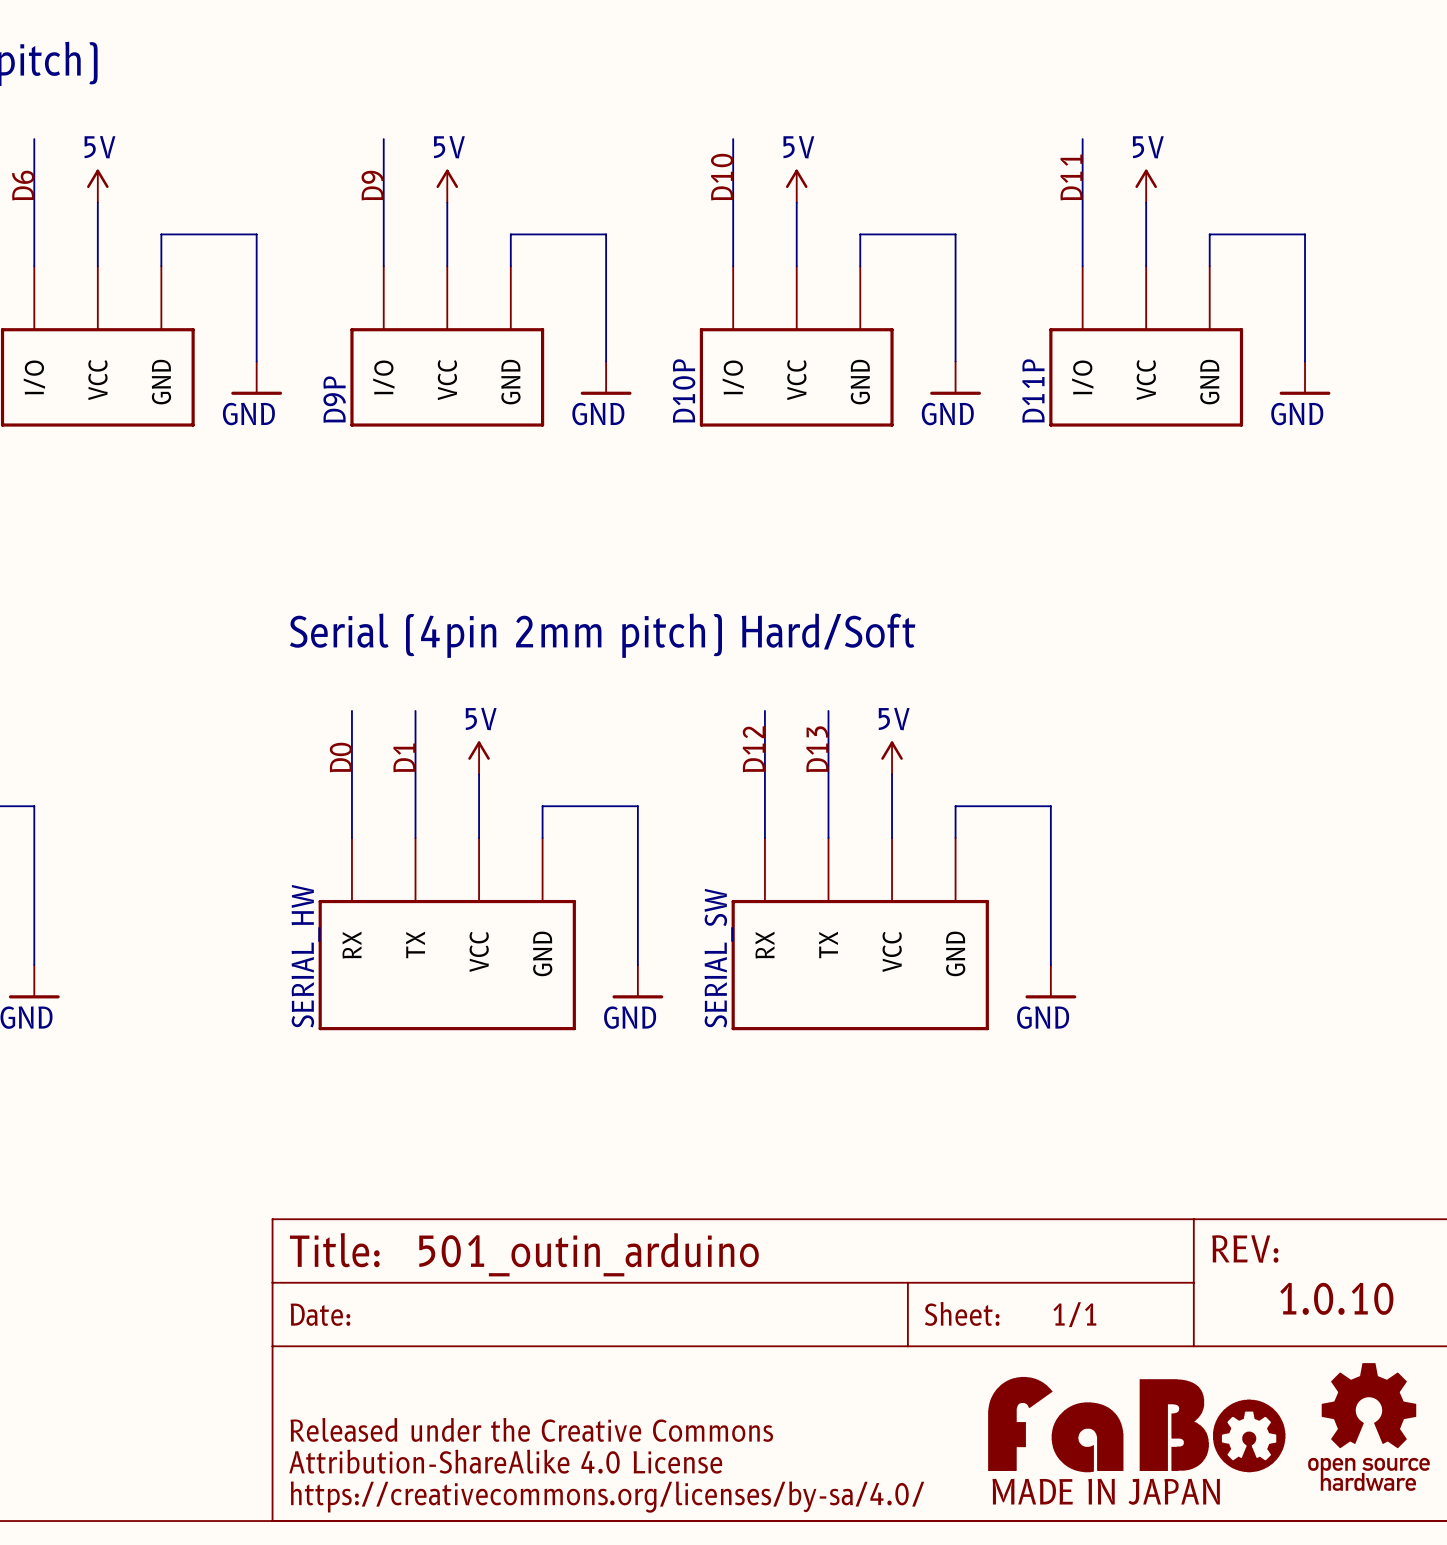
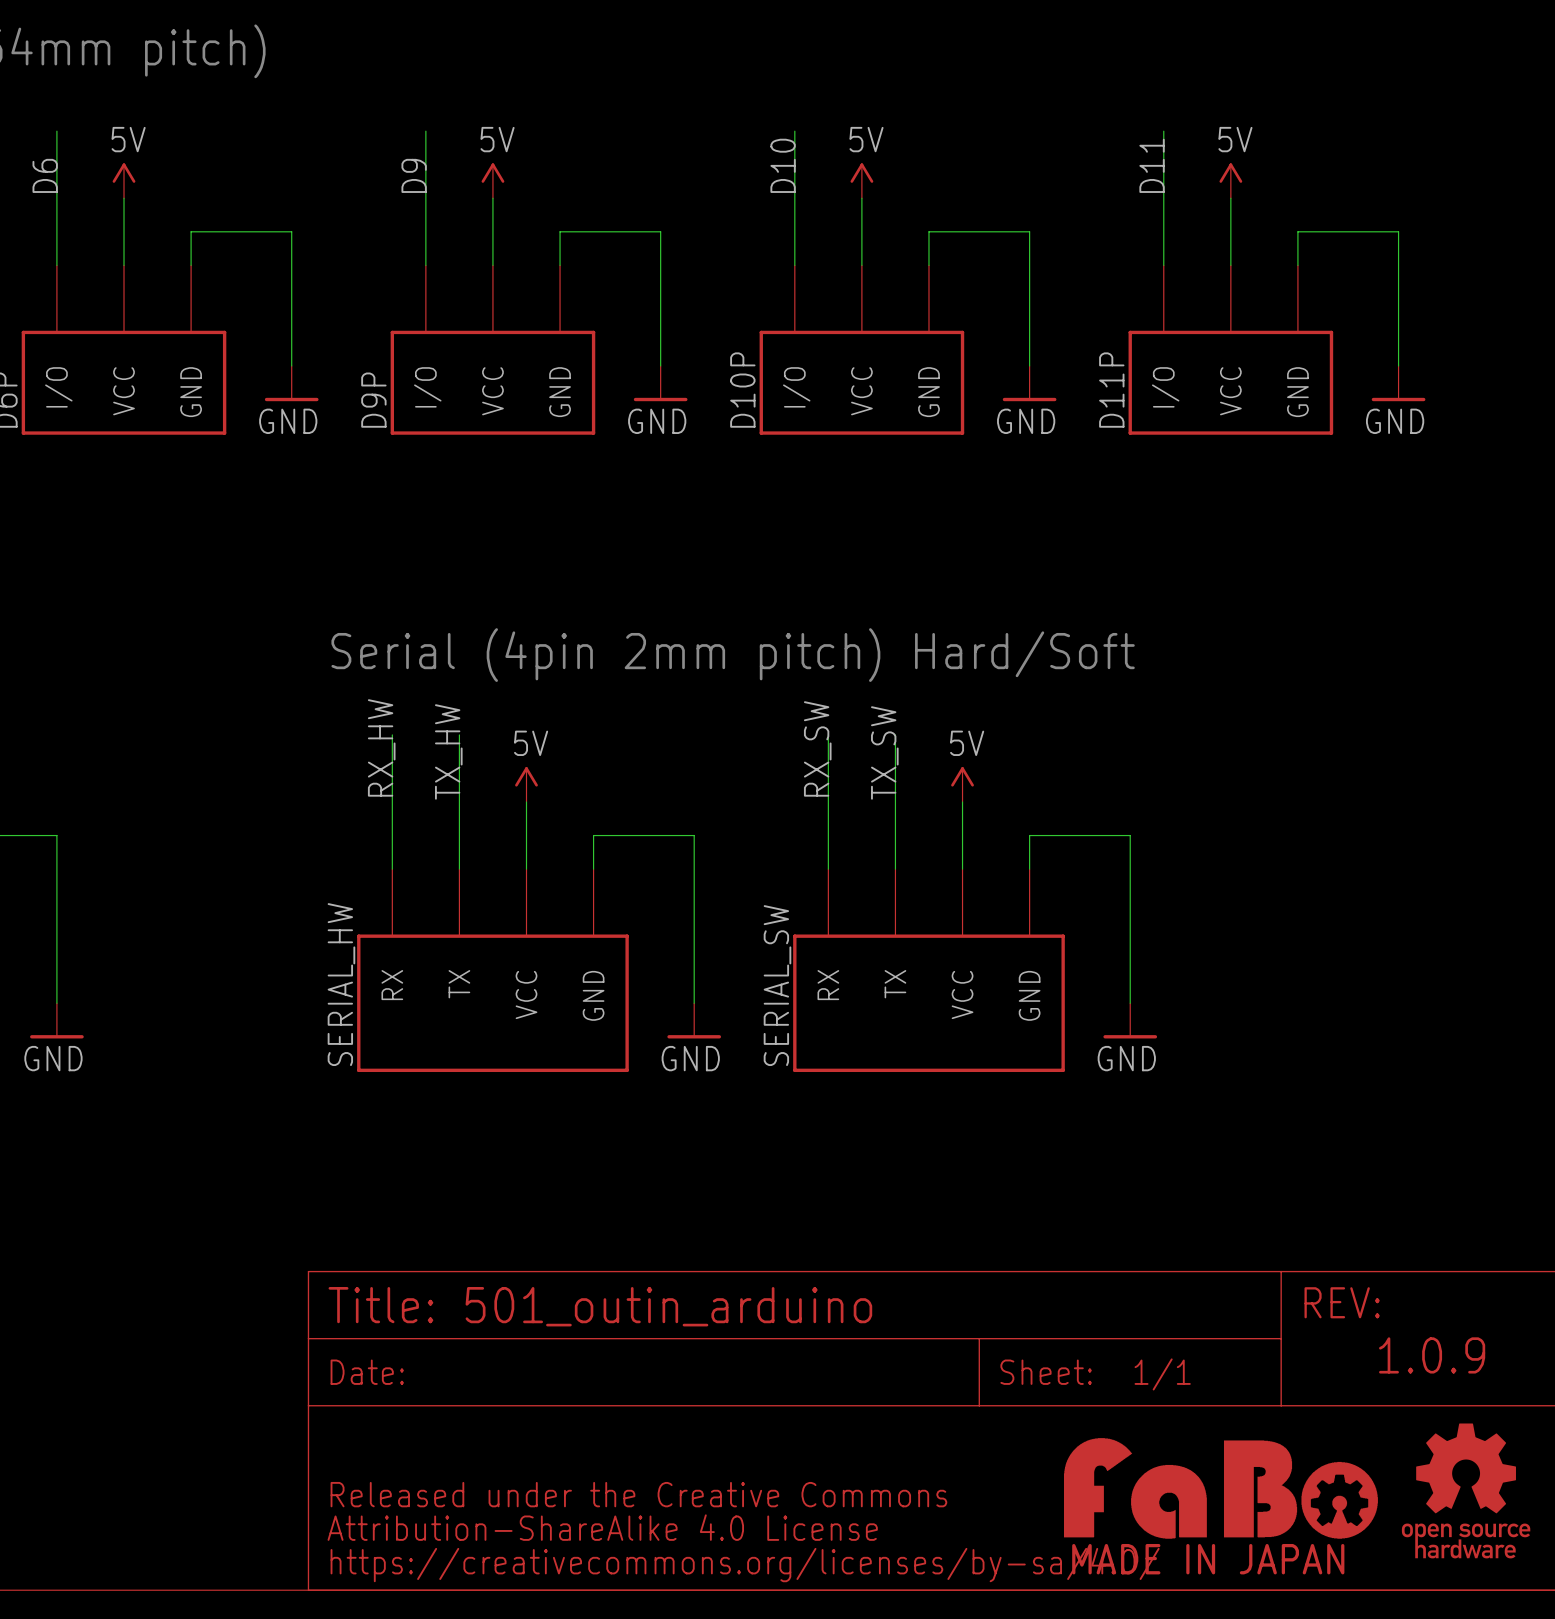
label: D12 (753, 749) -> RX_SW (817, 748)
label: D13 (817, 749) -> TX_SW (884, 752)
label: D0 (341, 757) -> RX_HW (381, 747)
label: D1 (404, 757) -> TX_HW (448, 751)
text: 1.0.10 (1336, 1298) -> 1.0.9 (1432, 1355)

